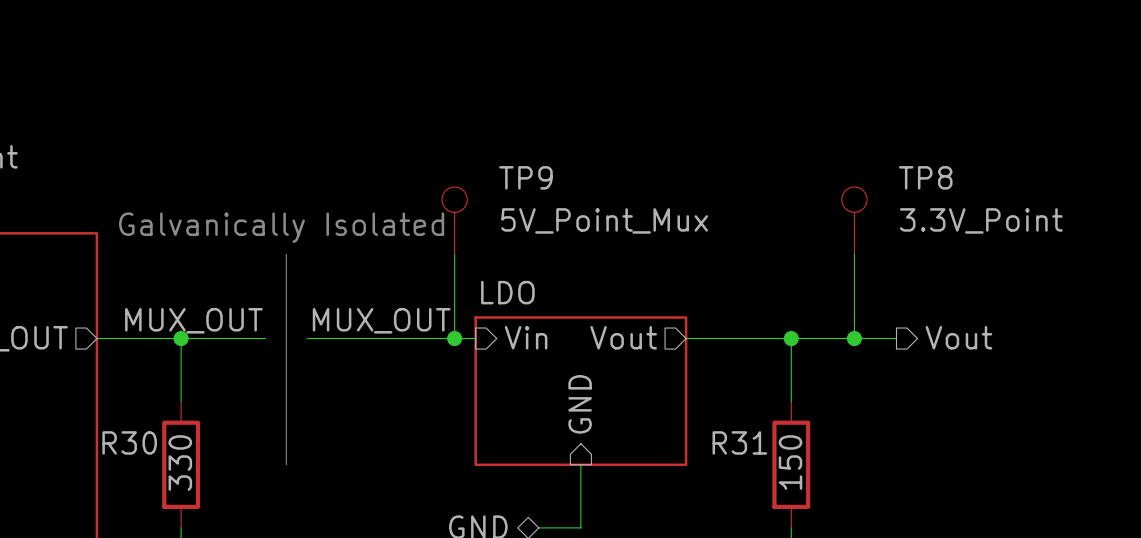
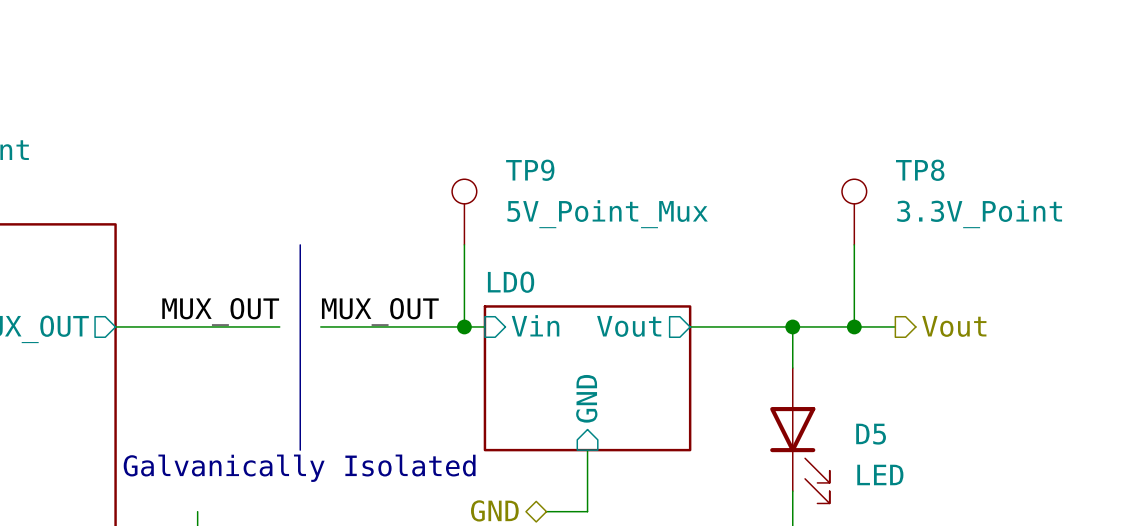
text position: Galvanically Isolated (281, 227) -> Galvanically Isolated (299, 468)
wire: (181, 338) (181, 401) -> none
junction: (181, 338) -> none
D5: none -> LED (799, 435)
R30: 330 (181, 464) -> none
R31: 150 (791, 464) -> none

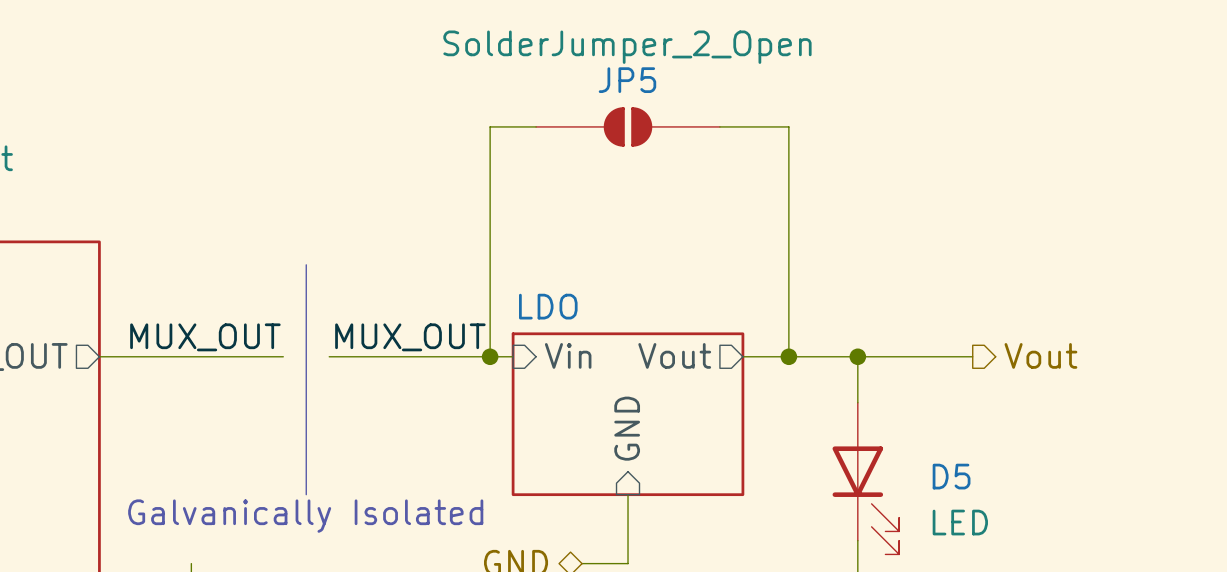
wire: none -> (536, 126) (490, 126) (490, 264)
JP5: none -> SolderJumper_2_Open (628, 126)
wire: none -> (719, 126) (788, 126) (788, 356)
TP9: 5V_Point_Mux (464, 212) -> none
TP8: 3.3V_Point (854, 212) -> none
wire: (854, 244) (854, 326) -> none
junction: none -> (788, 356)
junction: (854, 326) -> none

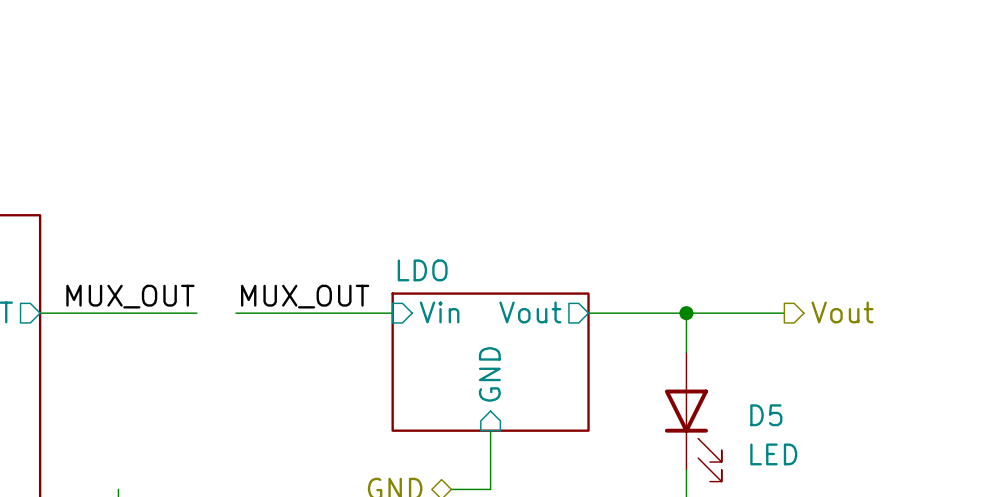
wire: (536, 126) (490, 126) (490, 356) -> none
JP5: SolderJumper_2_Open (628, 126) -> none
wire: (719, 126) (788, 126) (788, 356) -> none
line: (306, 264) (306, 494) -> none
junction: (490, 356) -> none
junction: (788, 356) -> none
text: Galvanically Isolated (305, 516) -> none

